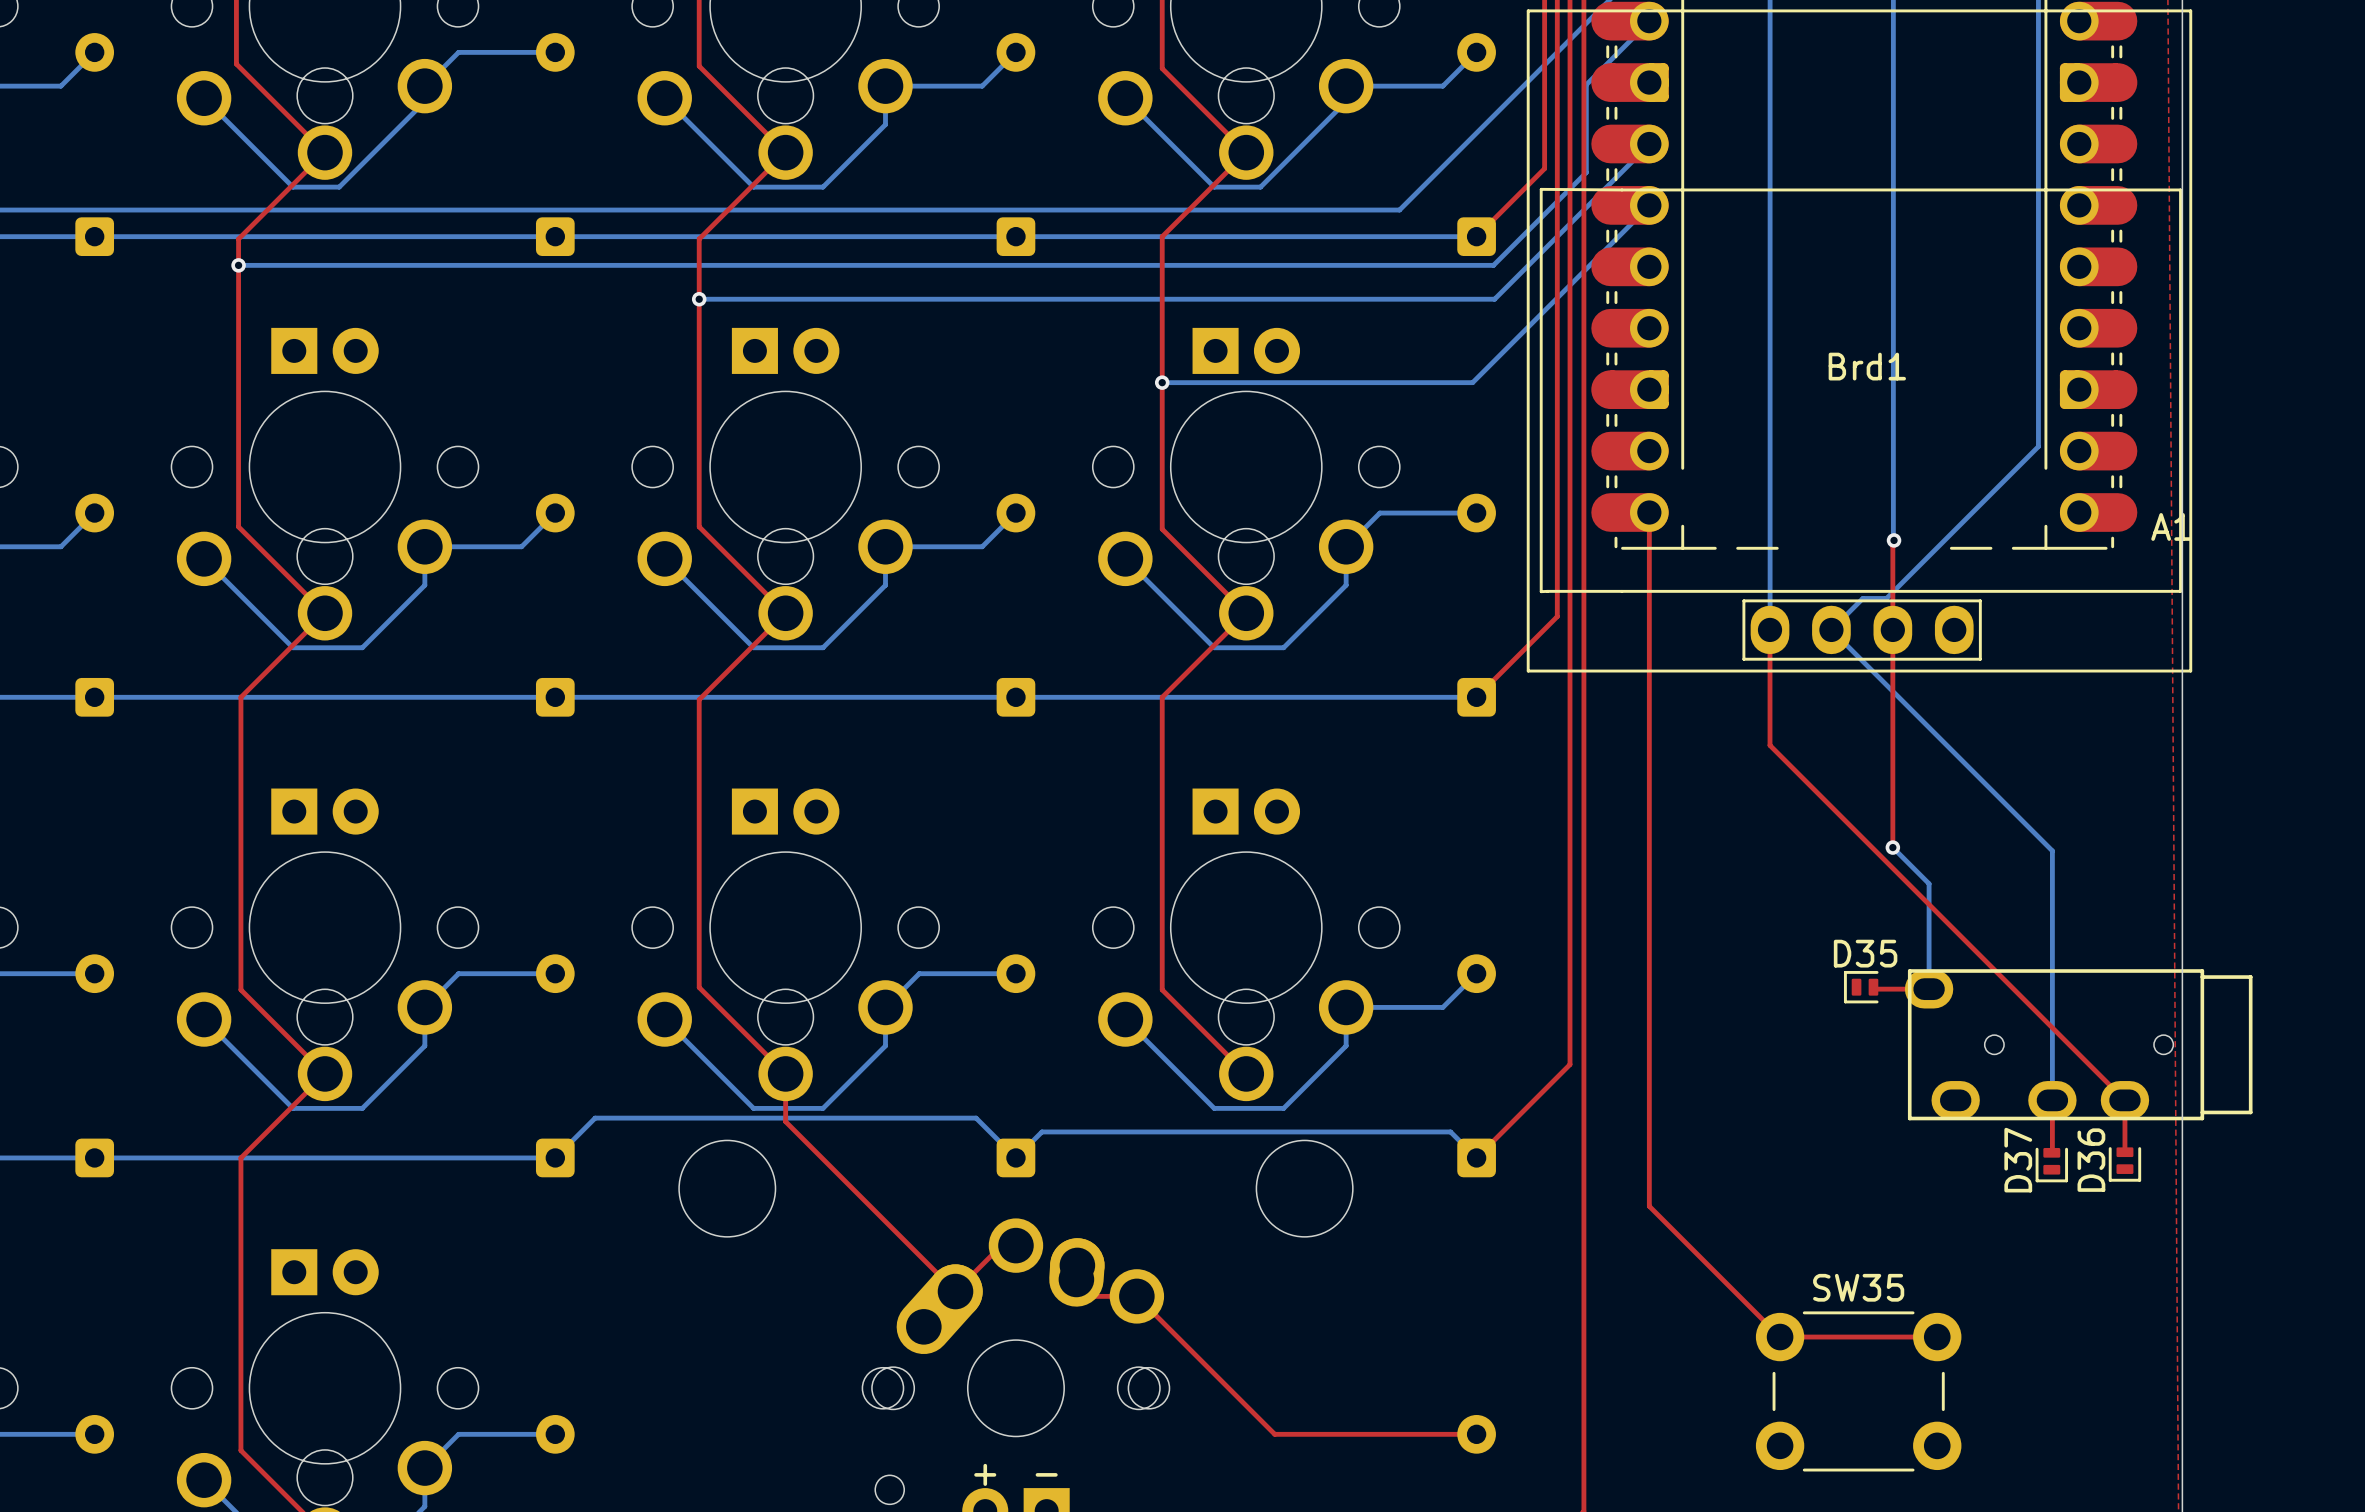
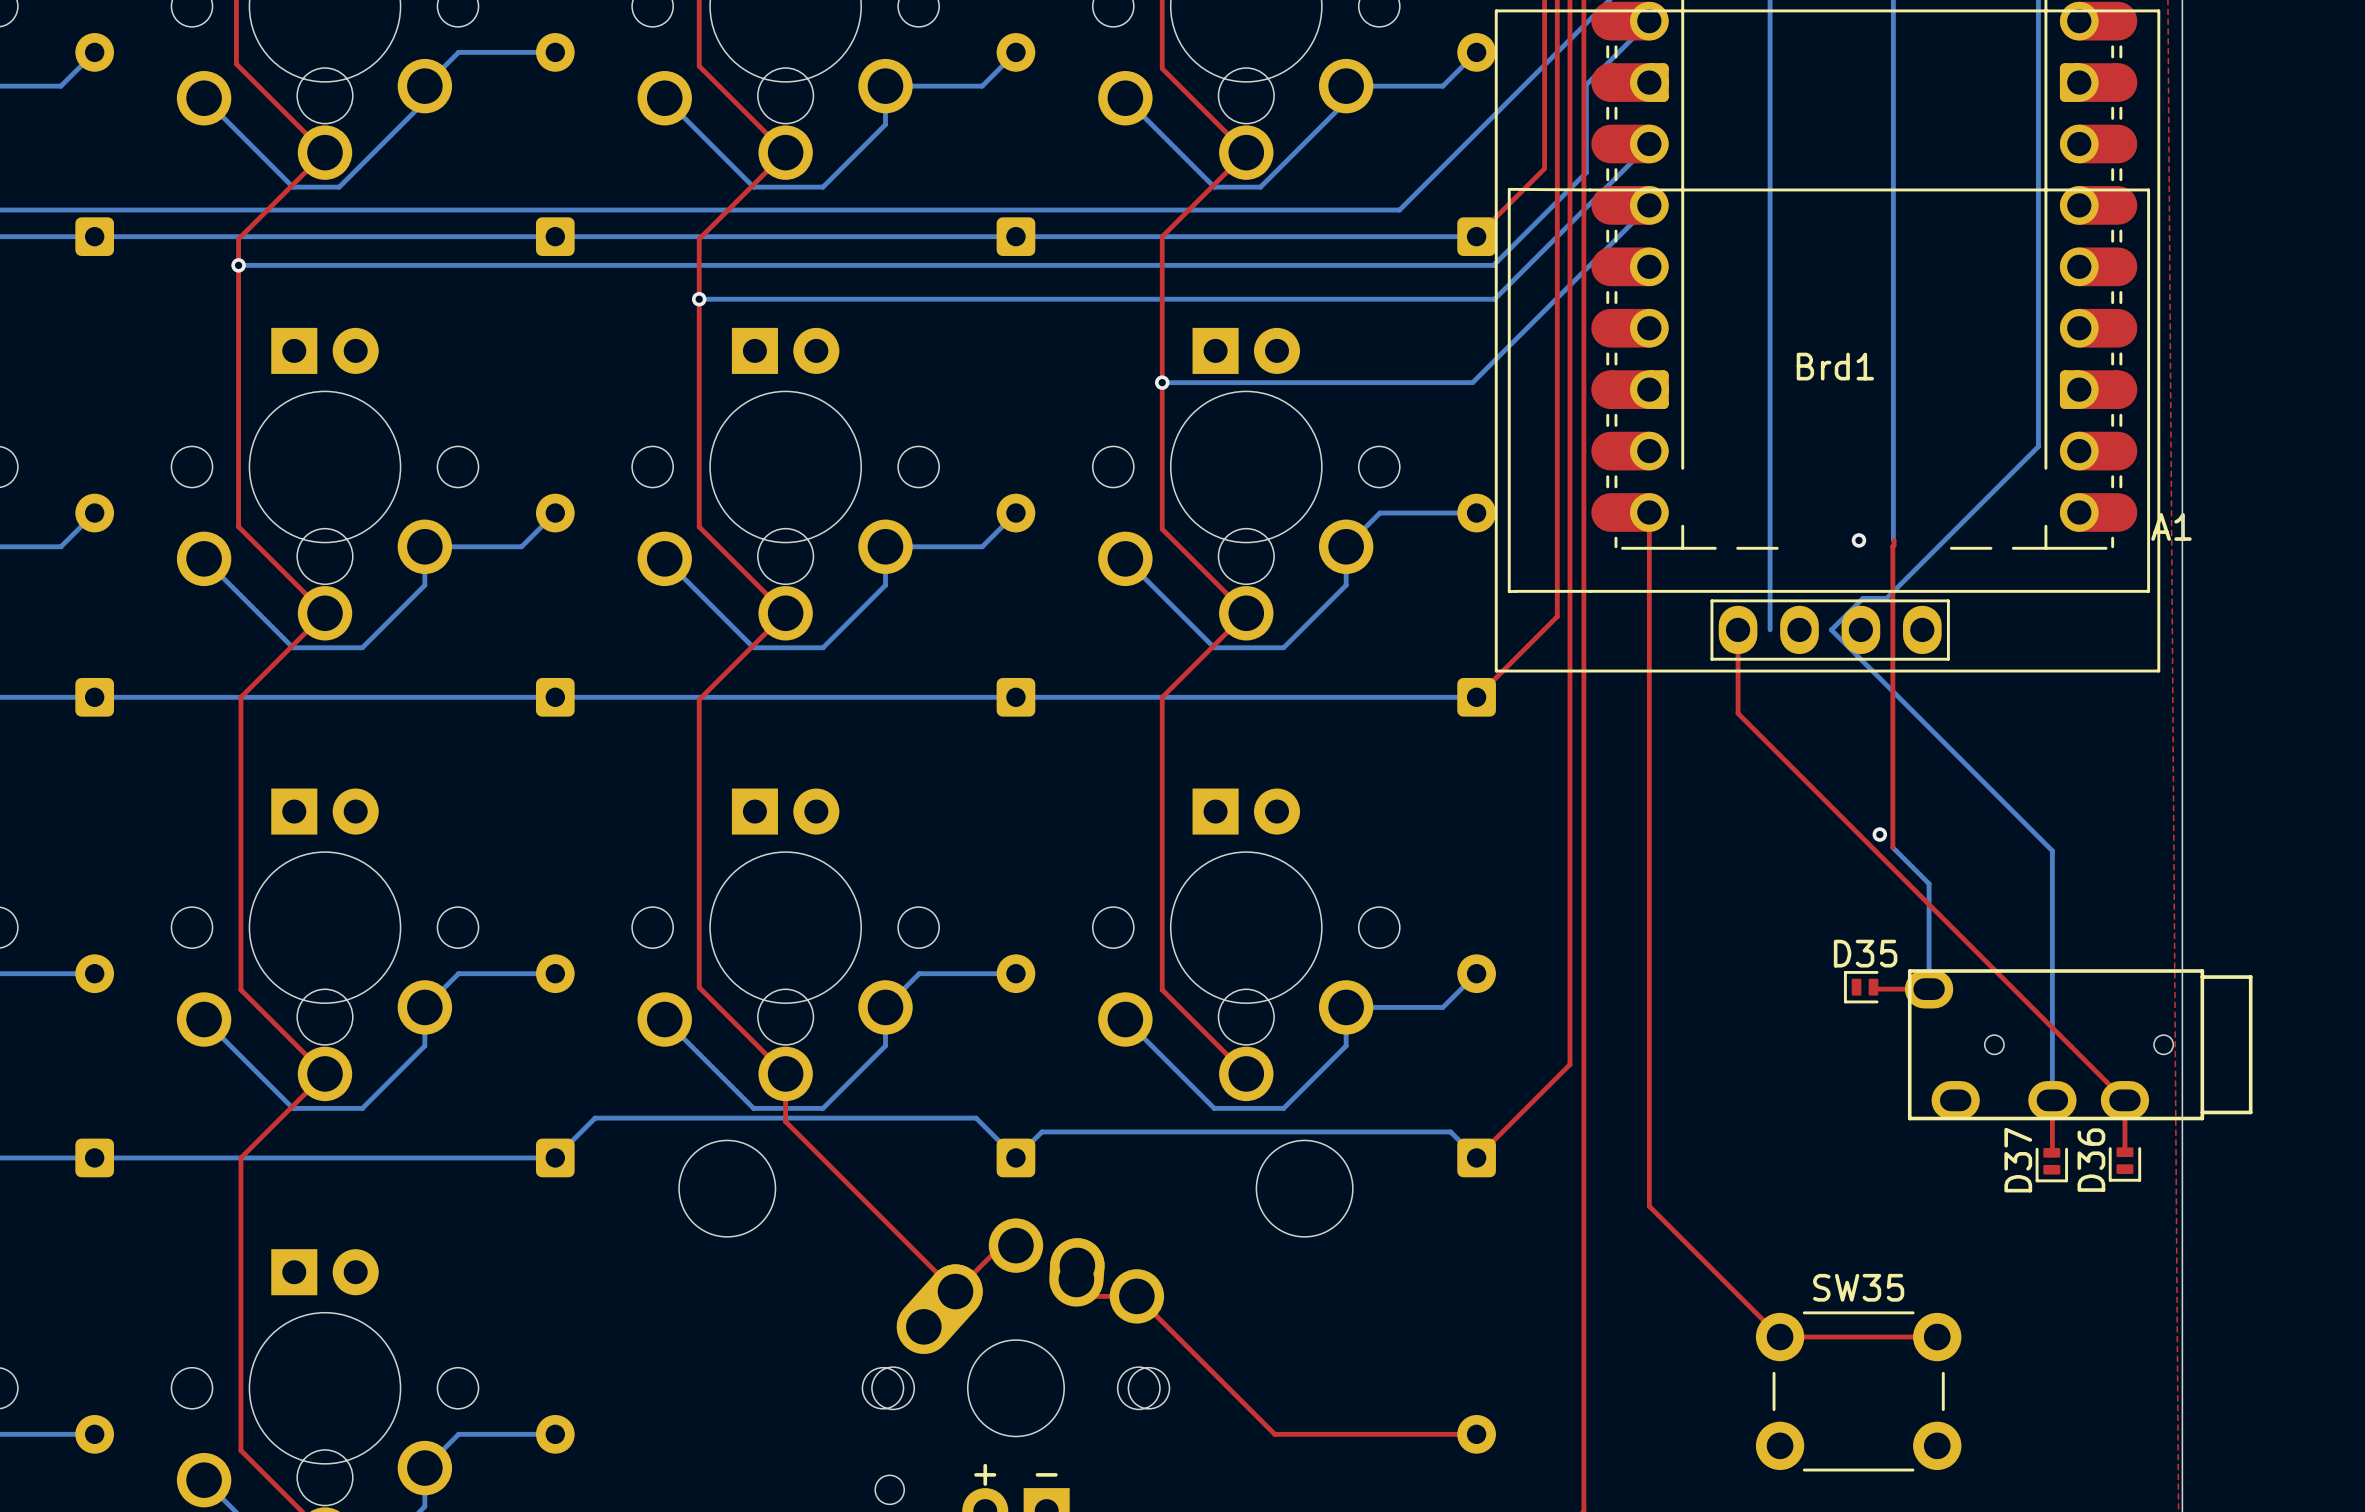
Brd1 position: (1859, 340) -> (1827, 340)
via position: (1894, 540) -> (1858, 540)
top track: (1770, 629) (1770, 745) -> (1738, 629) (1738, 713) (1770, 745)
via position: (1892, 847) -> (1879, 834)

